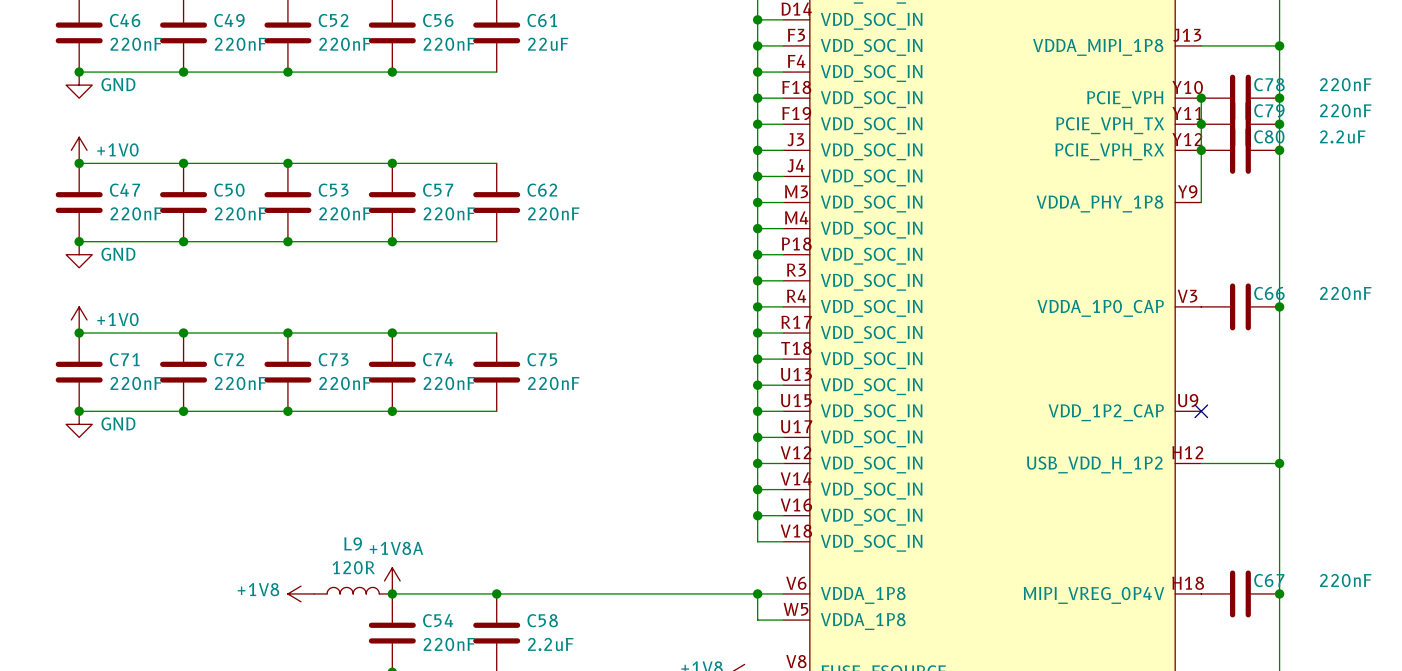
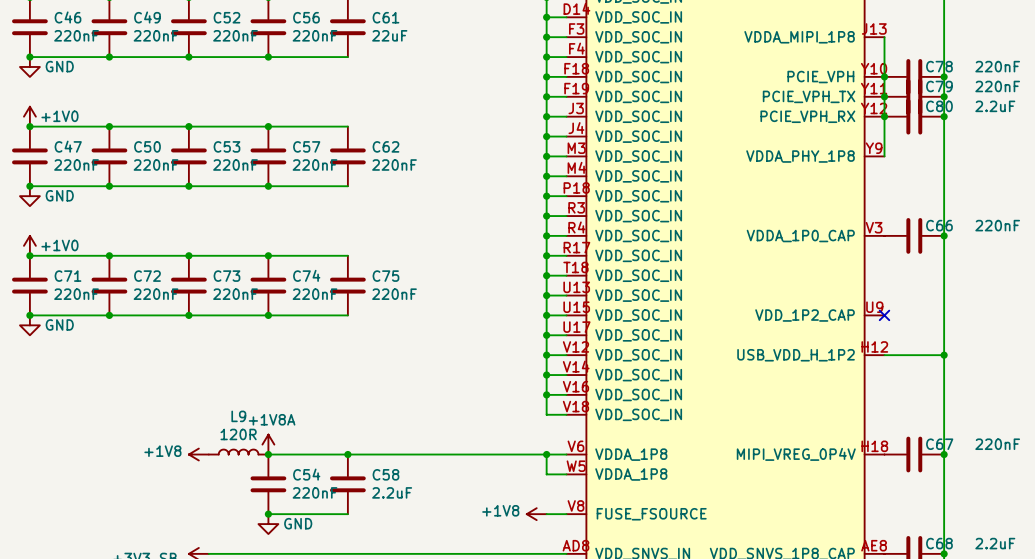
wire: (1201, 45) (1279, 45) -> (884, 37) (884, 76)
junction: (1279, 45) -> none

